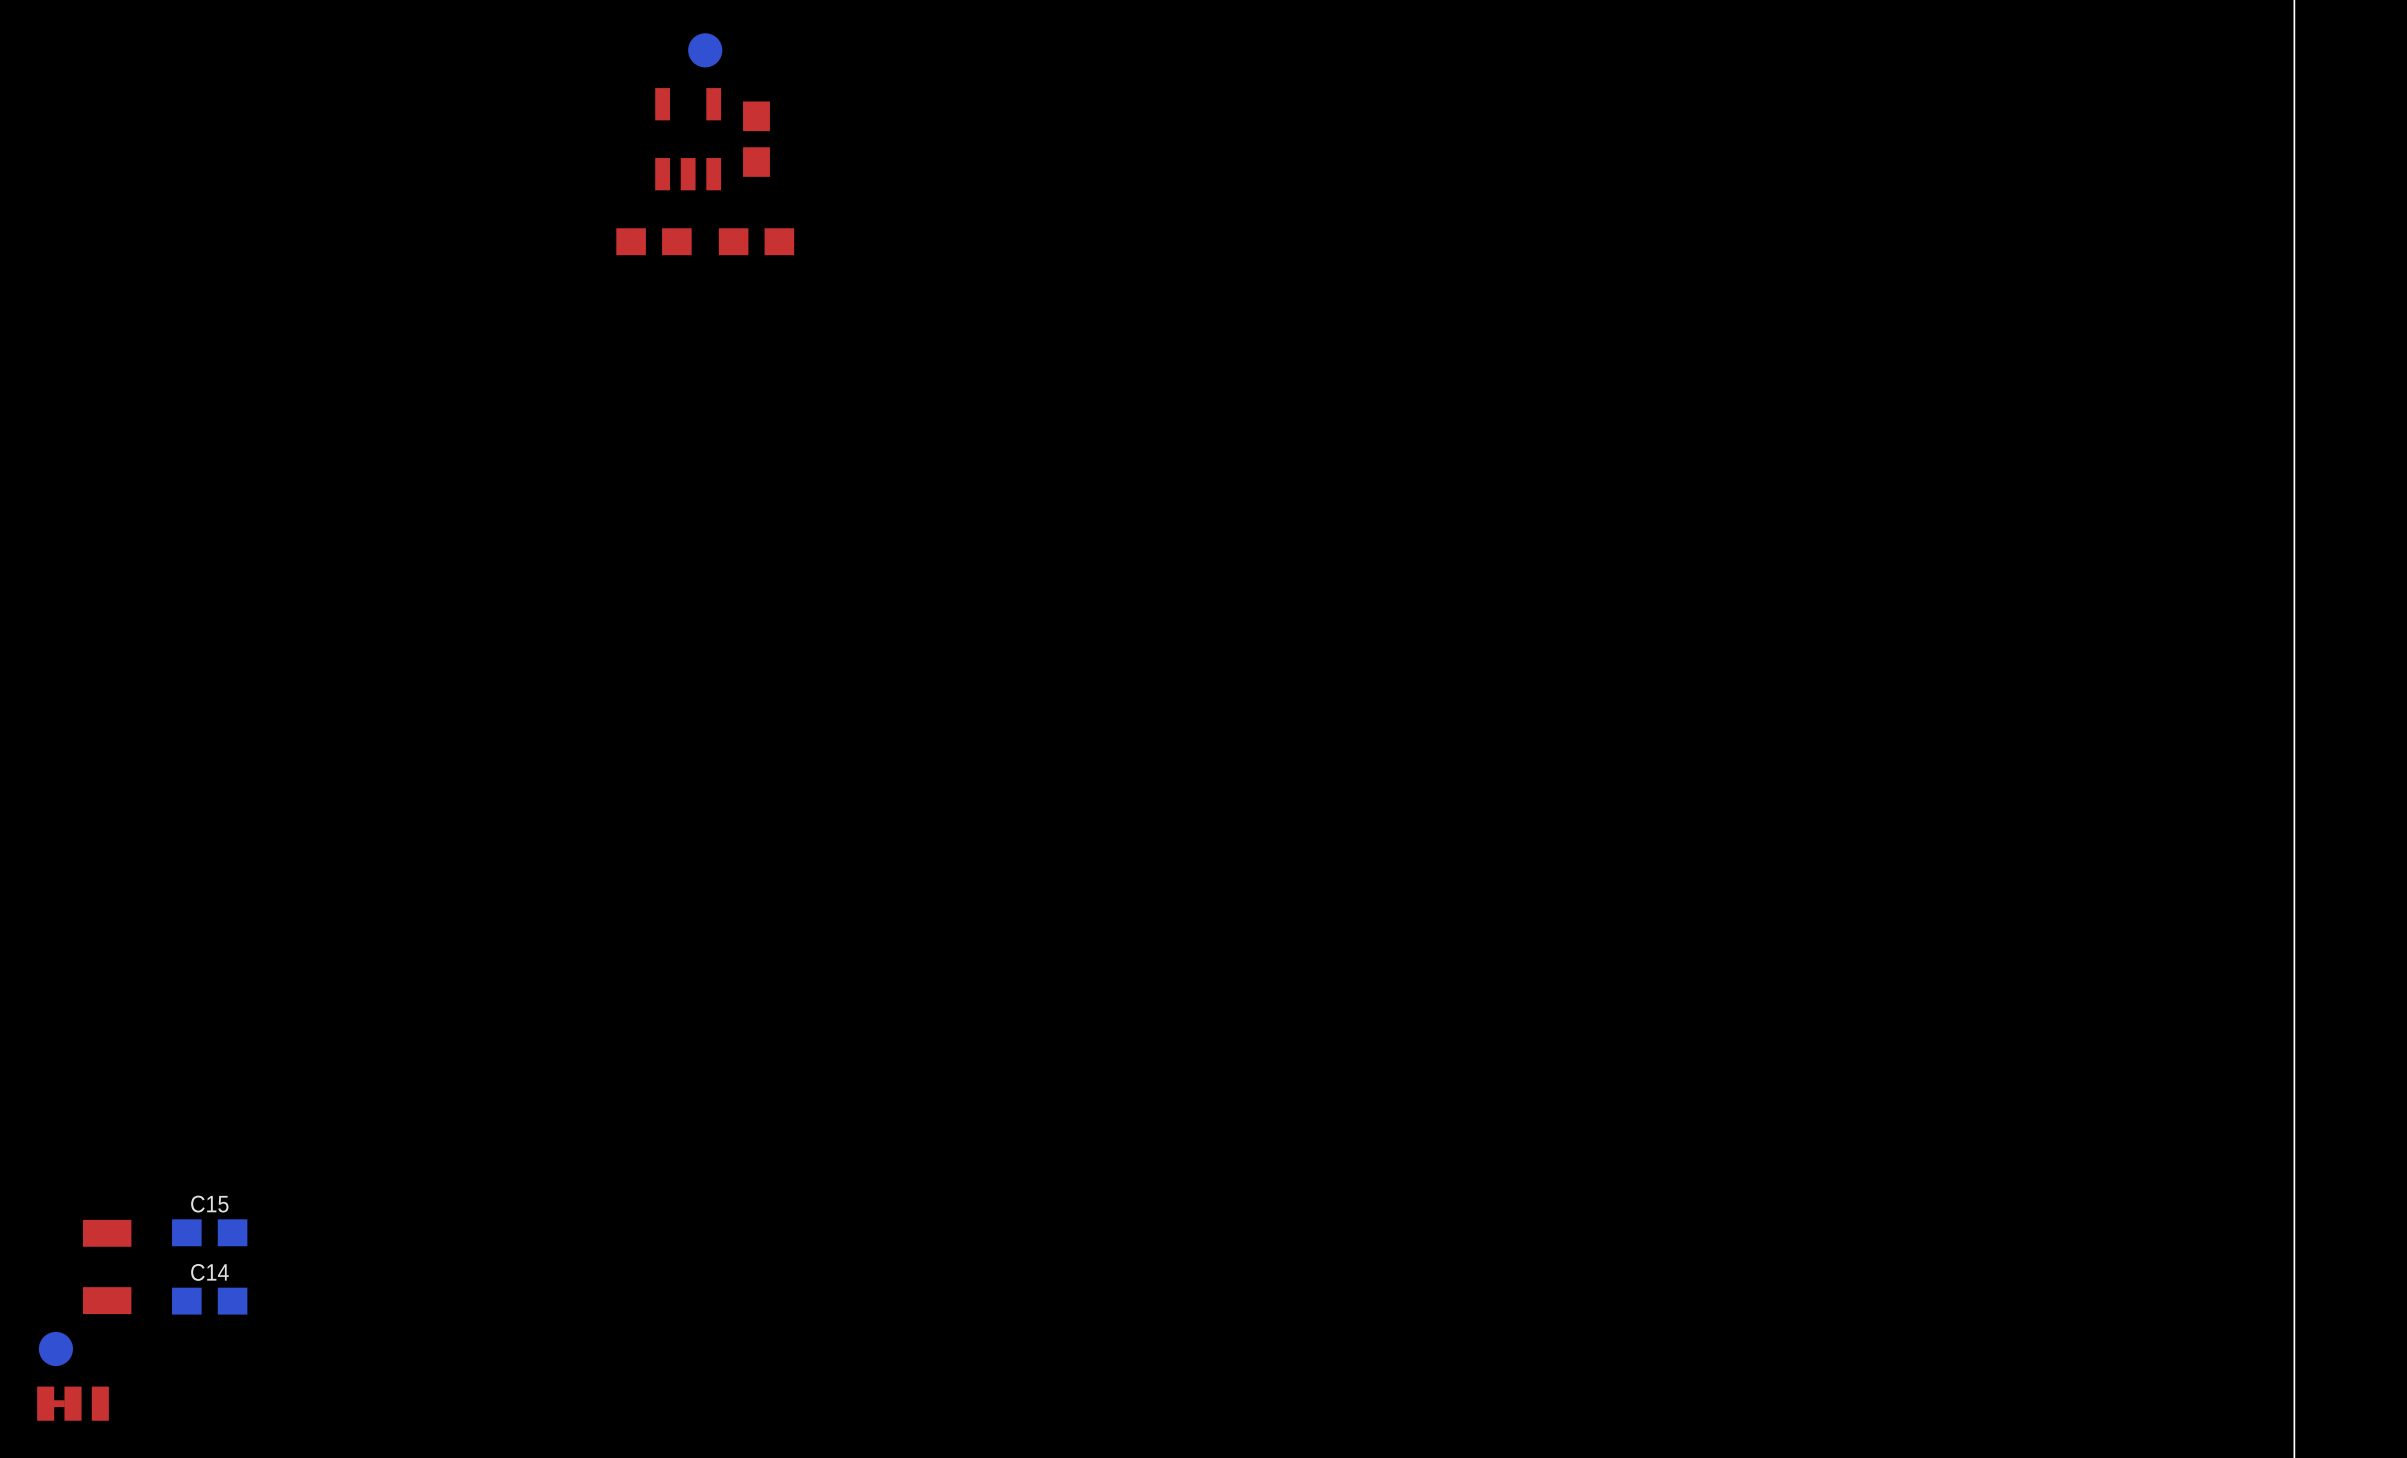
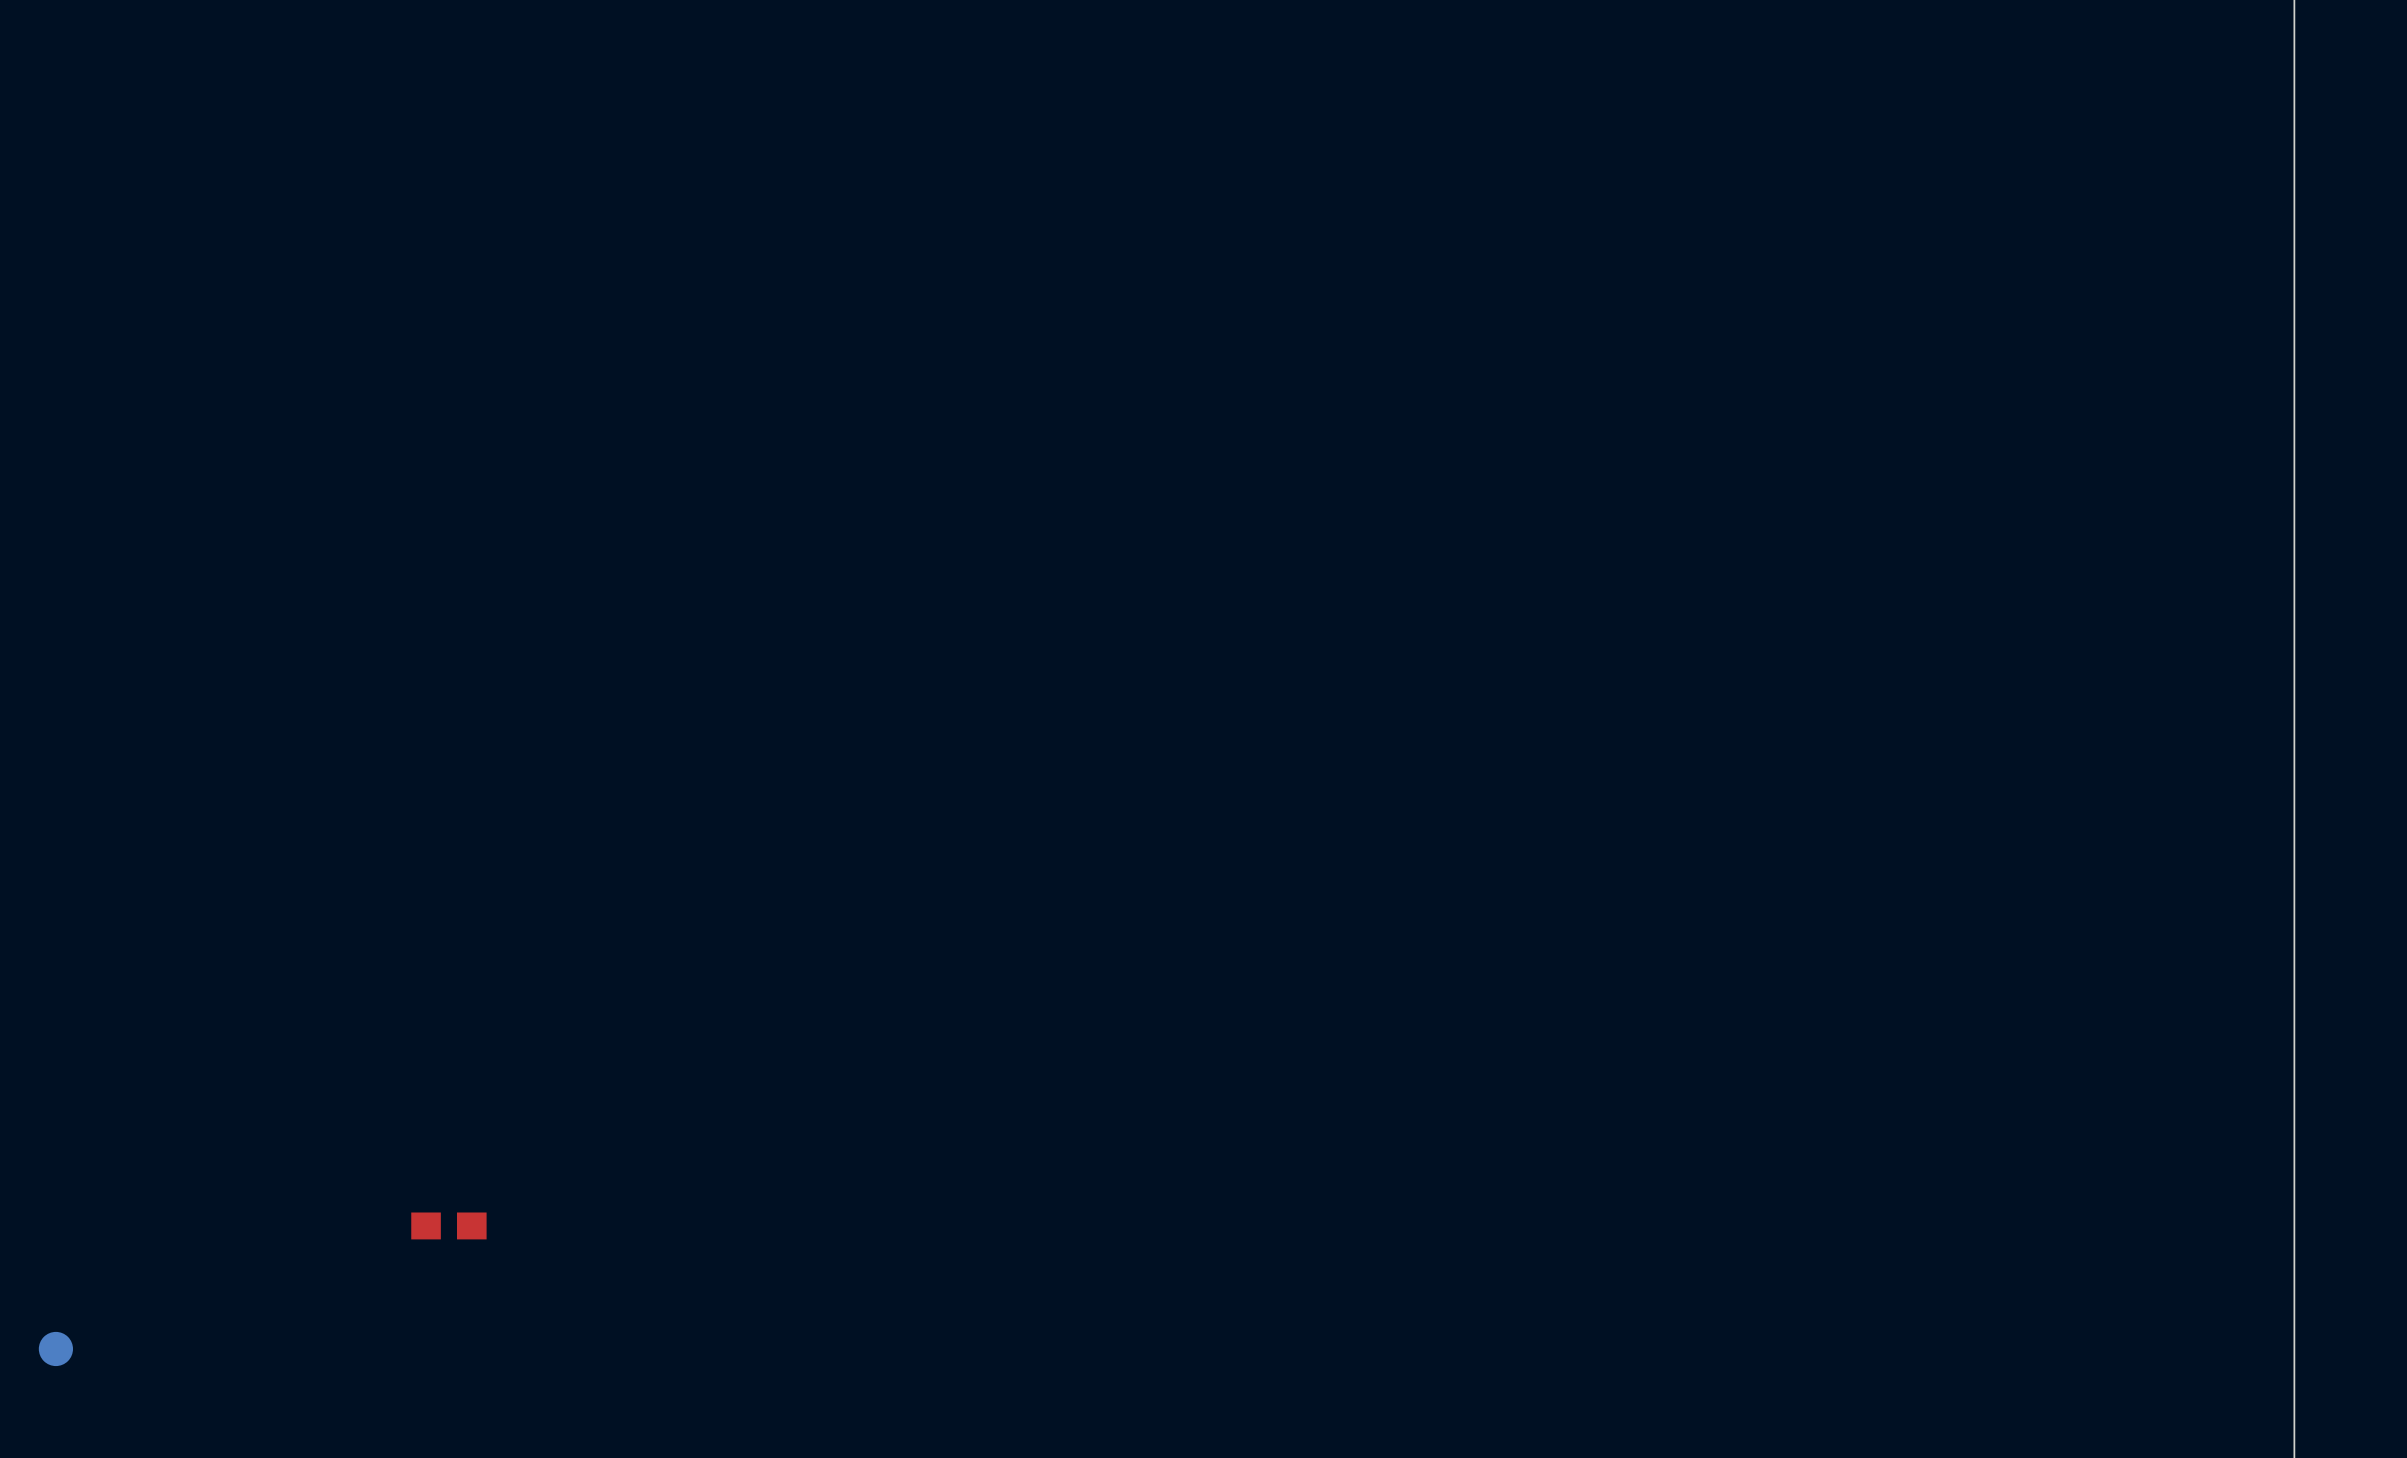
part: (705, 50) -> none
part: (688, 139) -> none
part: (756, 139) -> none
part: (653, 241) -> none
part: (756, 241) -> none
C15 side: bottom (209, 1232) -> top (448, 1225)
part: (107, 1266) -> none
C14: (209, 1301) -> none
part: (73, 1403) -> none

